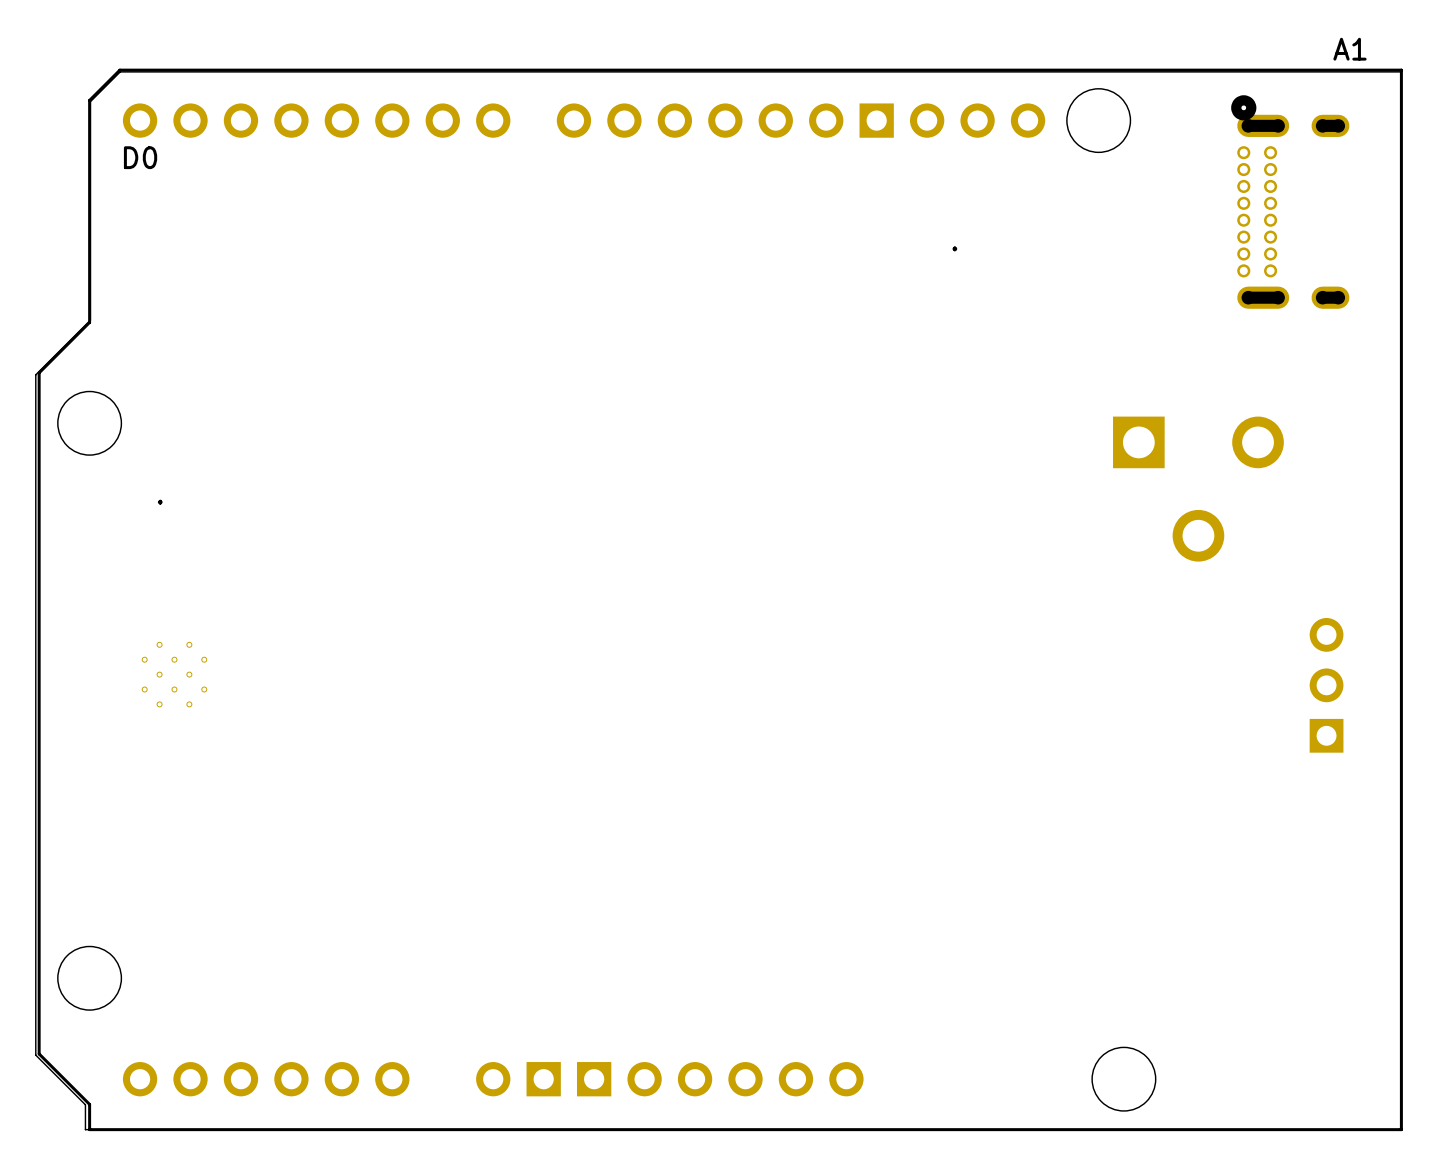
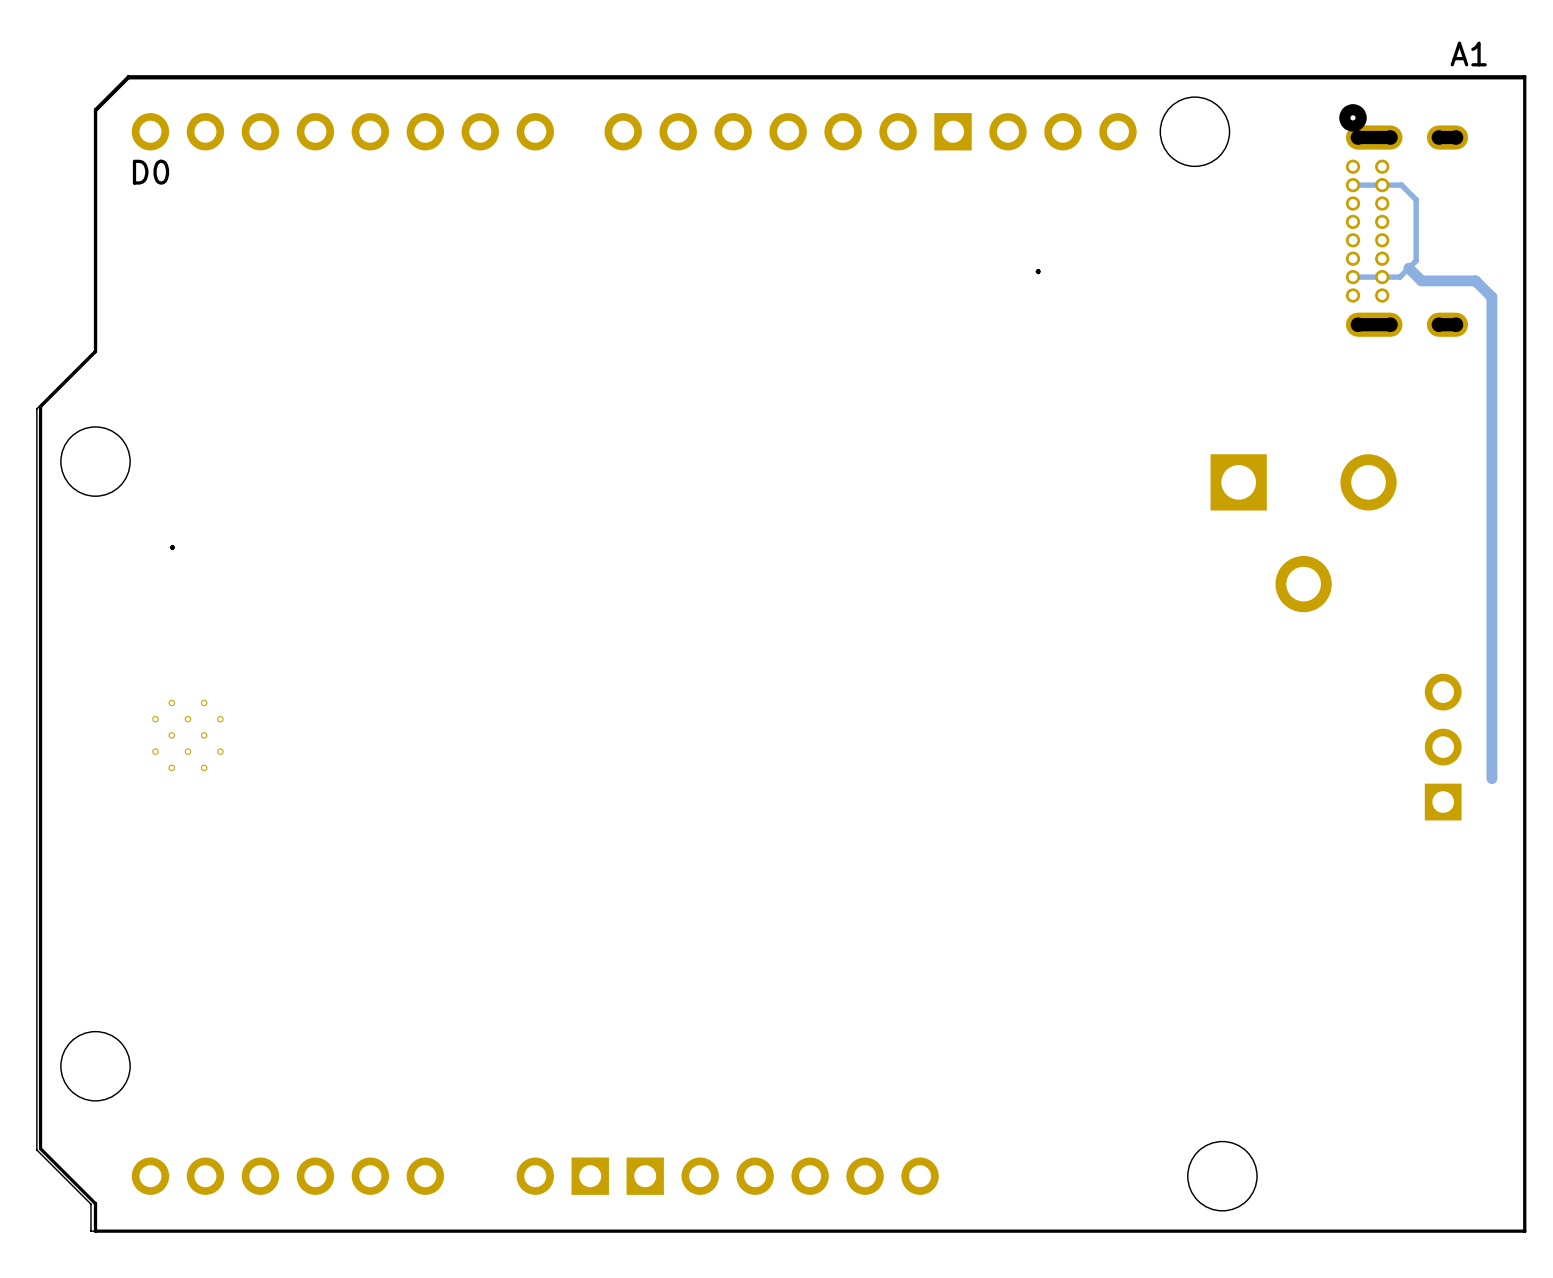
track: none -> (1353, 185) (1401, 185) (1416, 199) (1416, 260) (1399, 277) (1353, 277)
track: none -> (1408, 268) (1421, 280) (1475, 280) (1491, 297) (1491, 778)

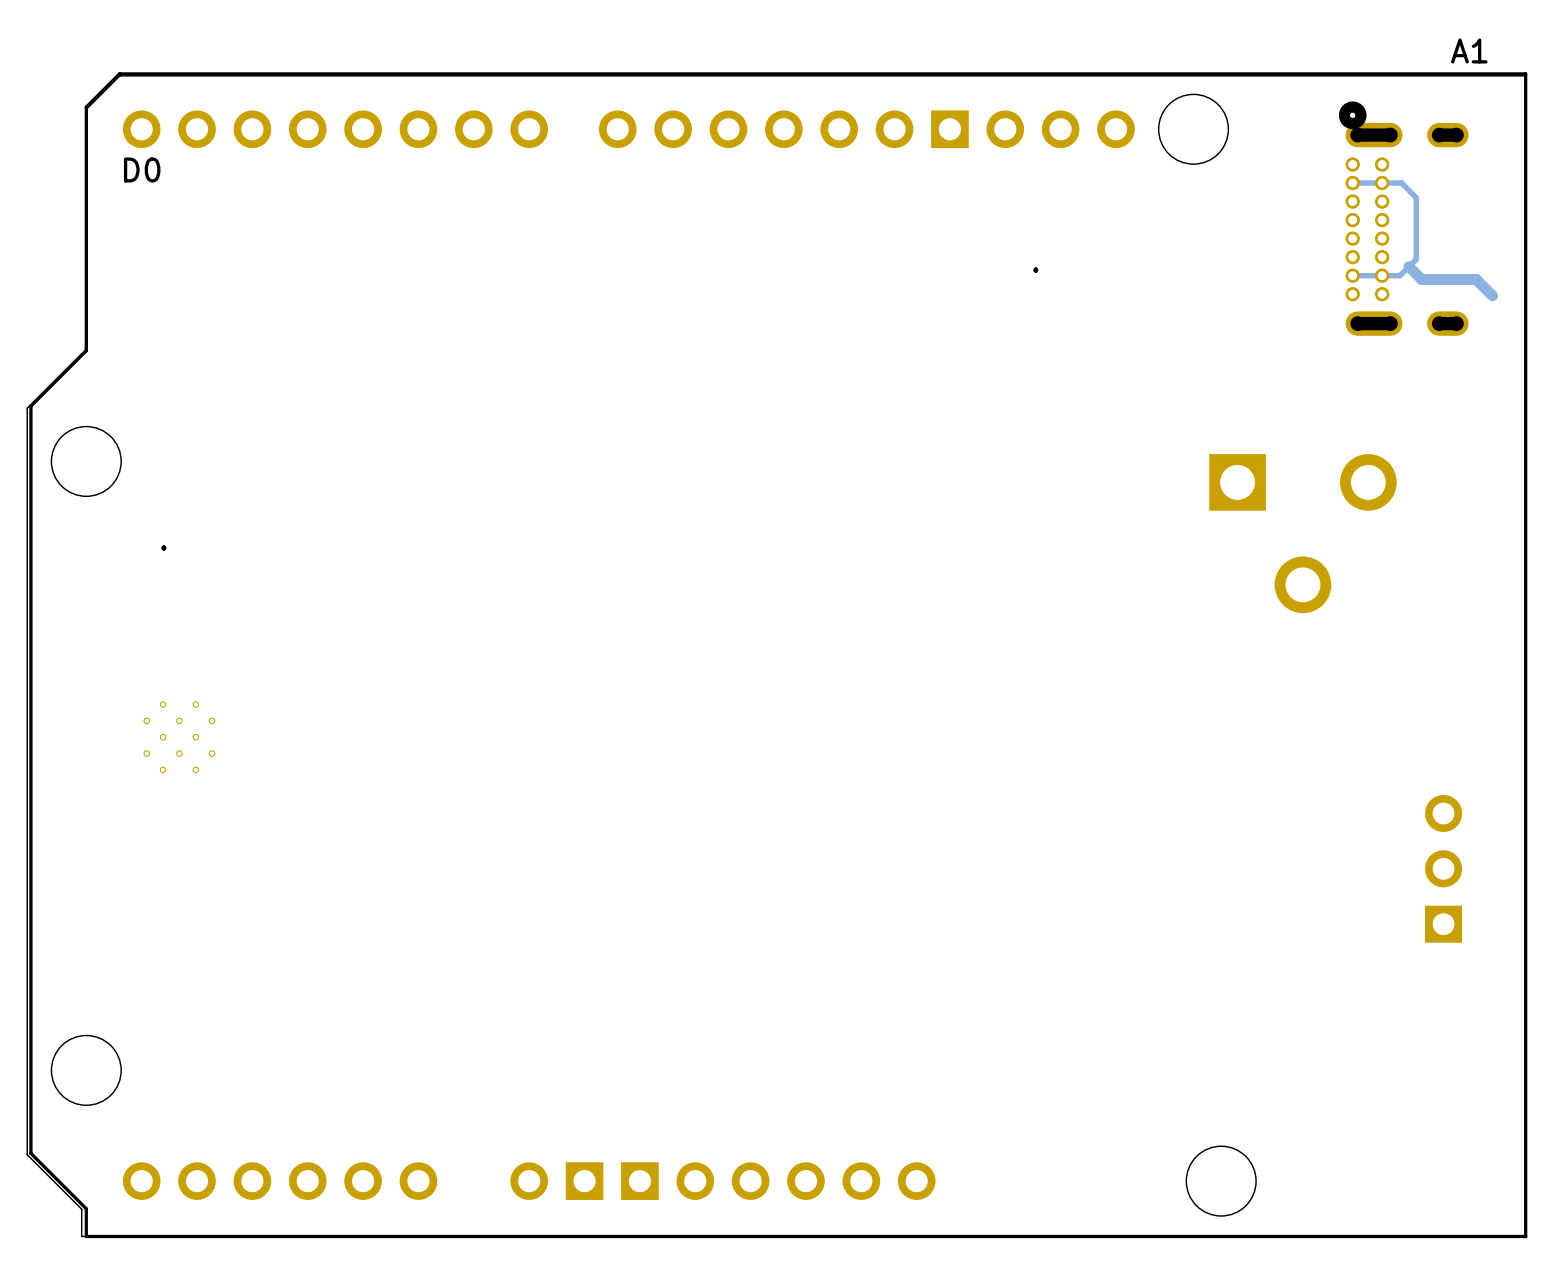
track: (1491, 297) (1491, 778) -> none
part position: (1443, 747) -> (1443, 868)

